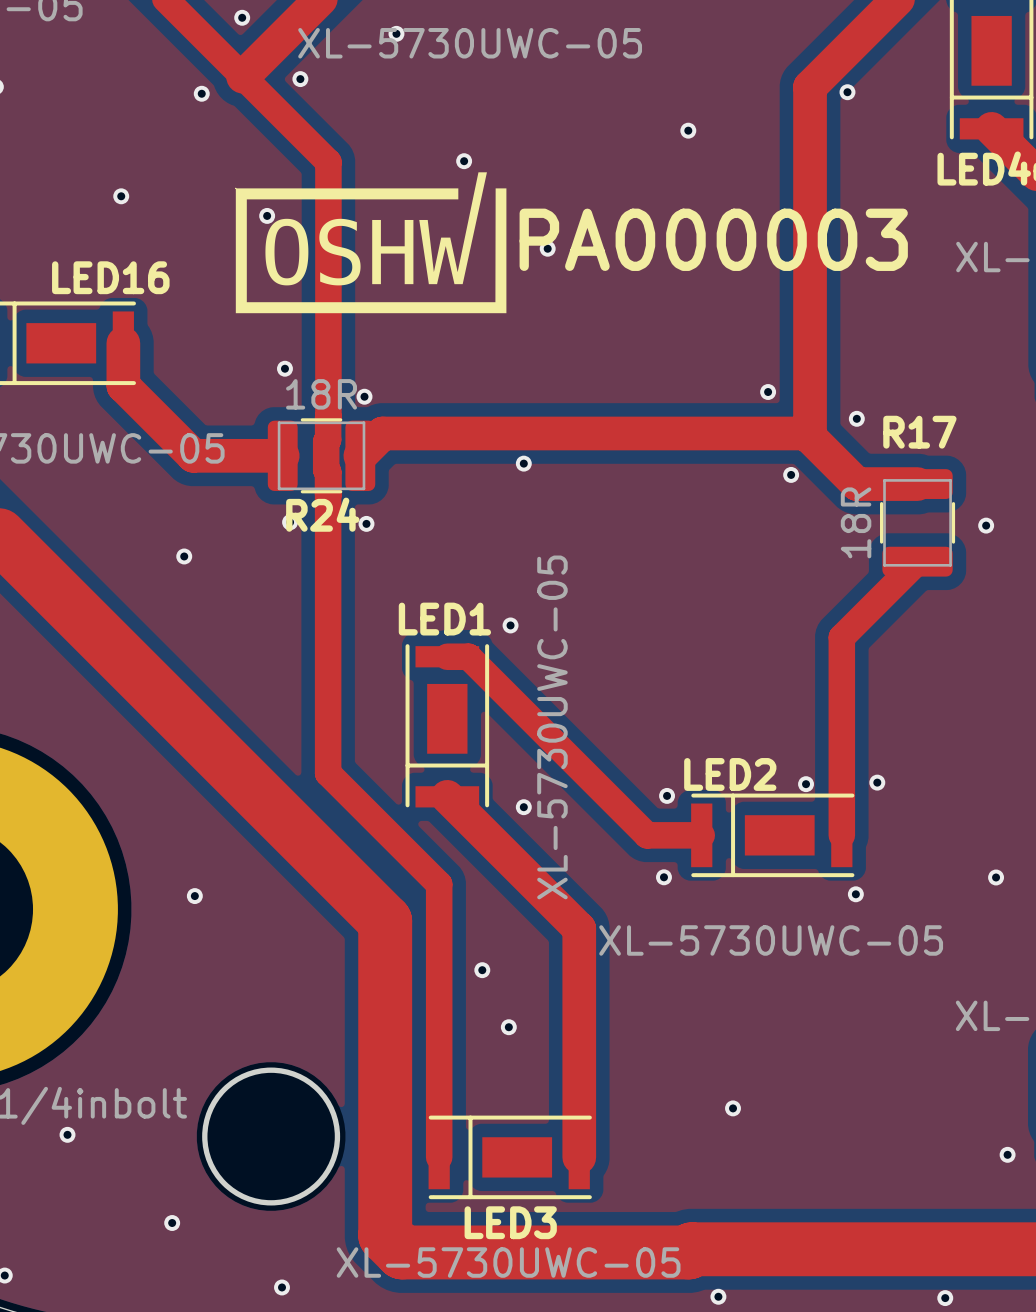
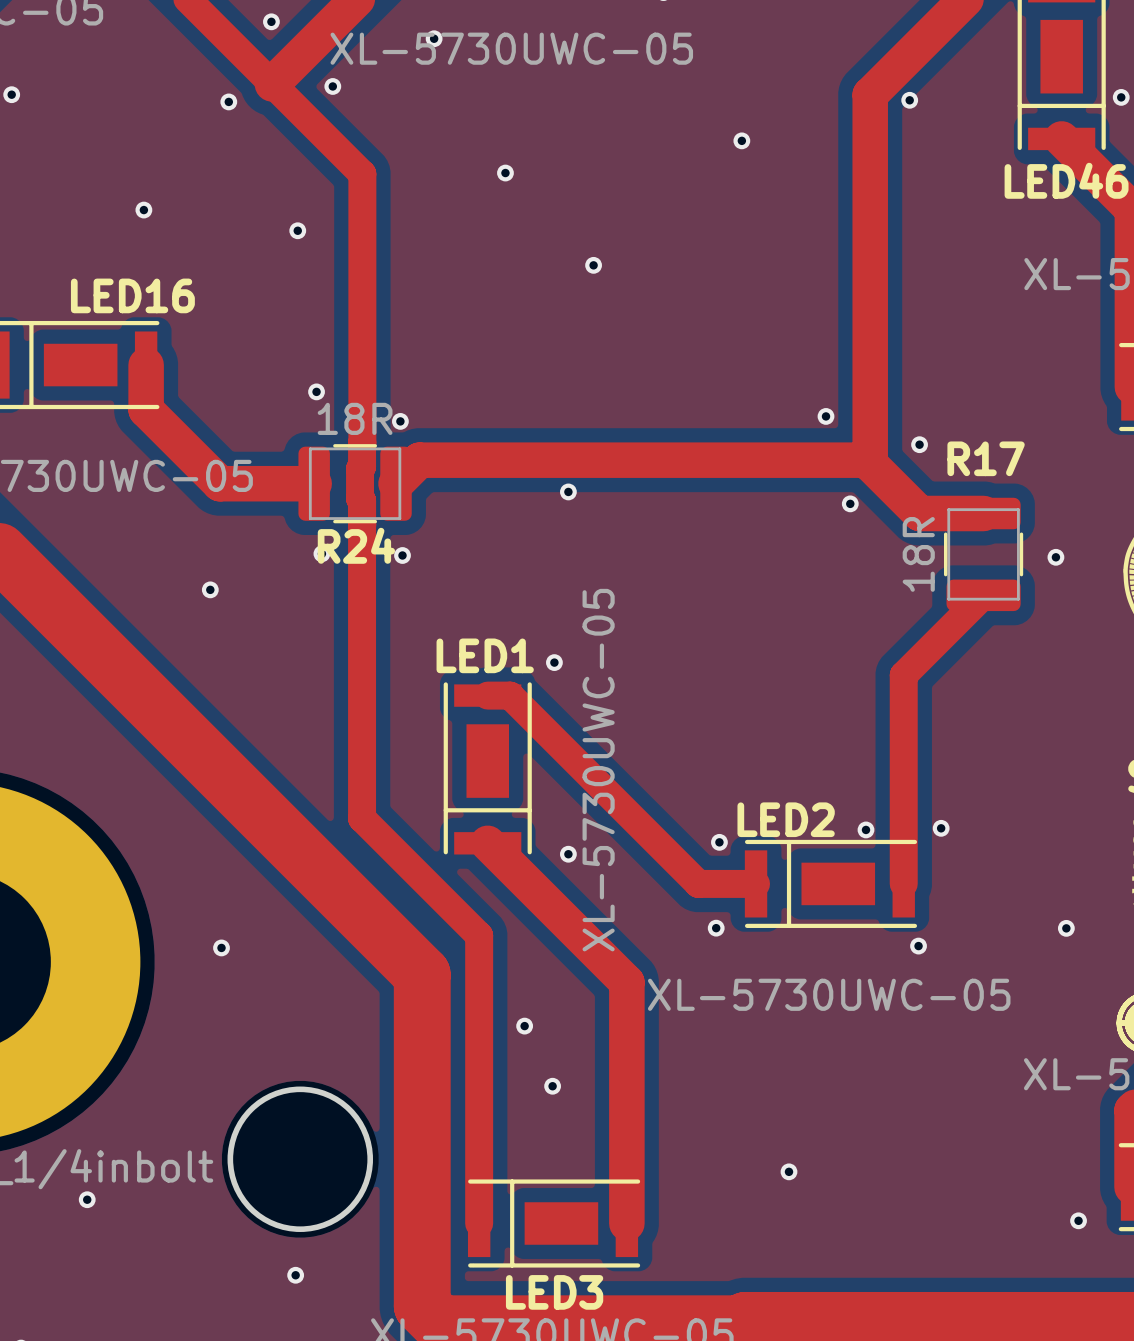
drawing: [235, 172, 507, 314] -> none
text: PA000003 (713, 239) -> none
round board edge position: (271, 1136) -> (300, 1159)
via position: (172, 1223) -> (295, 1275)

